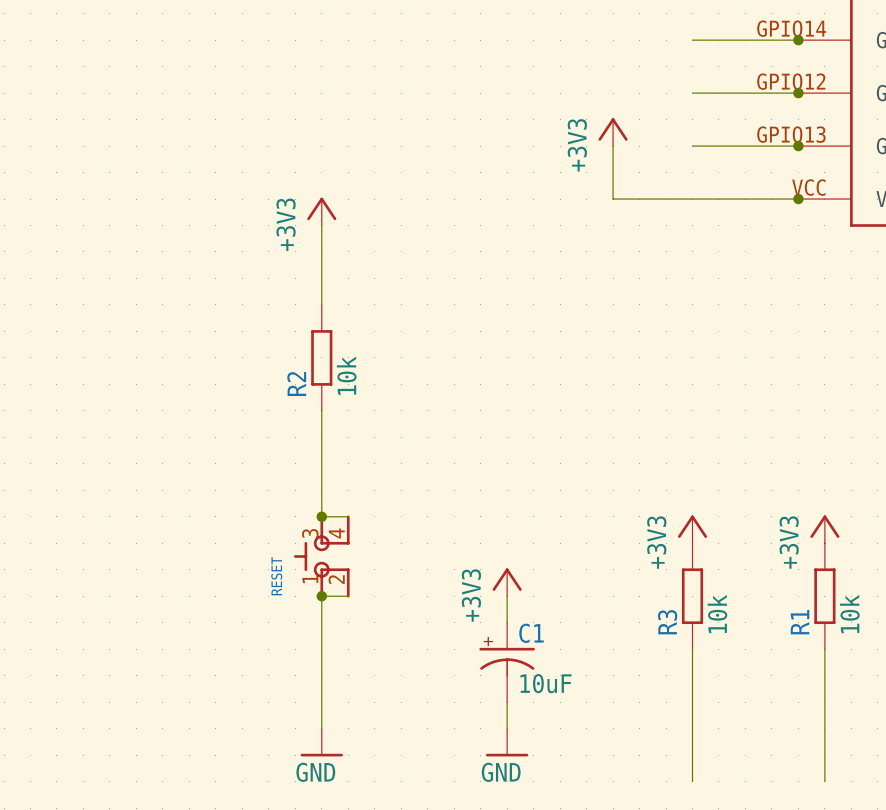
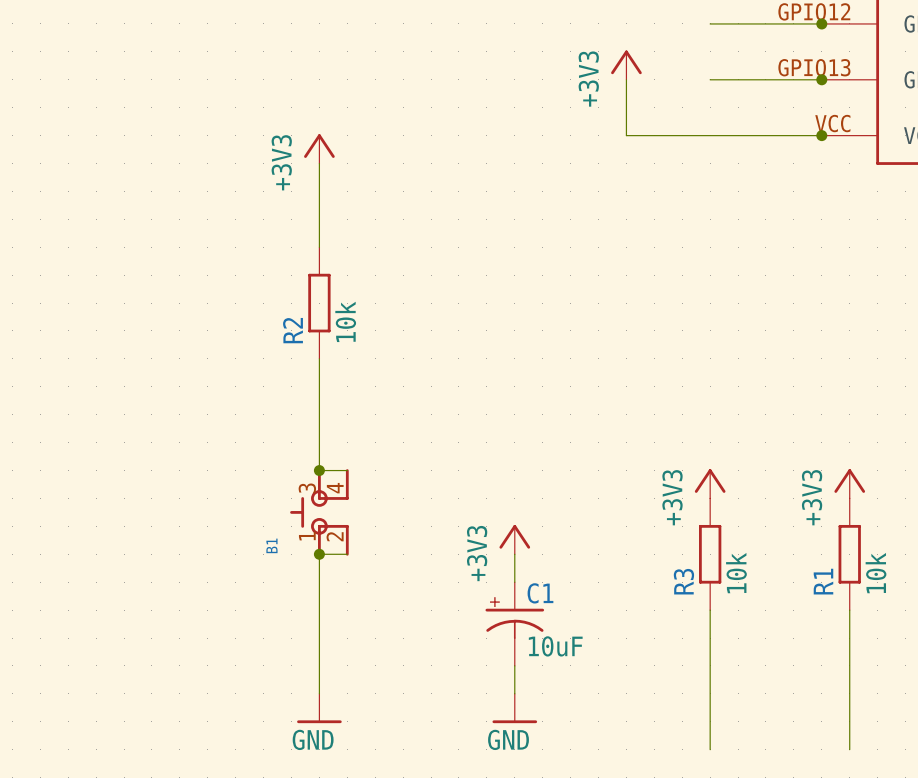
RESET name: RESET (276, 576) -> B1 (271, 545)

